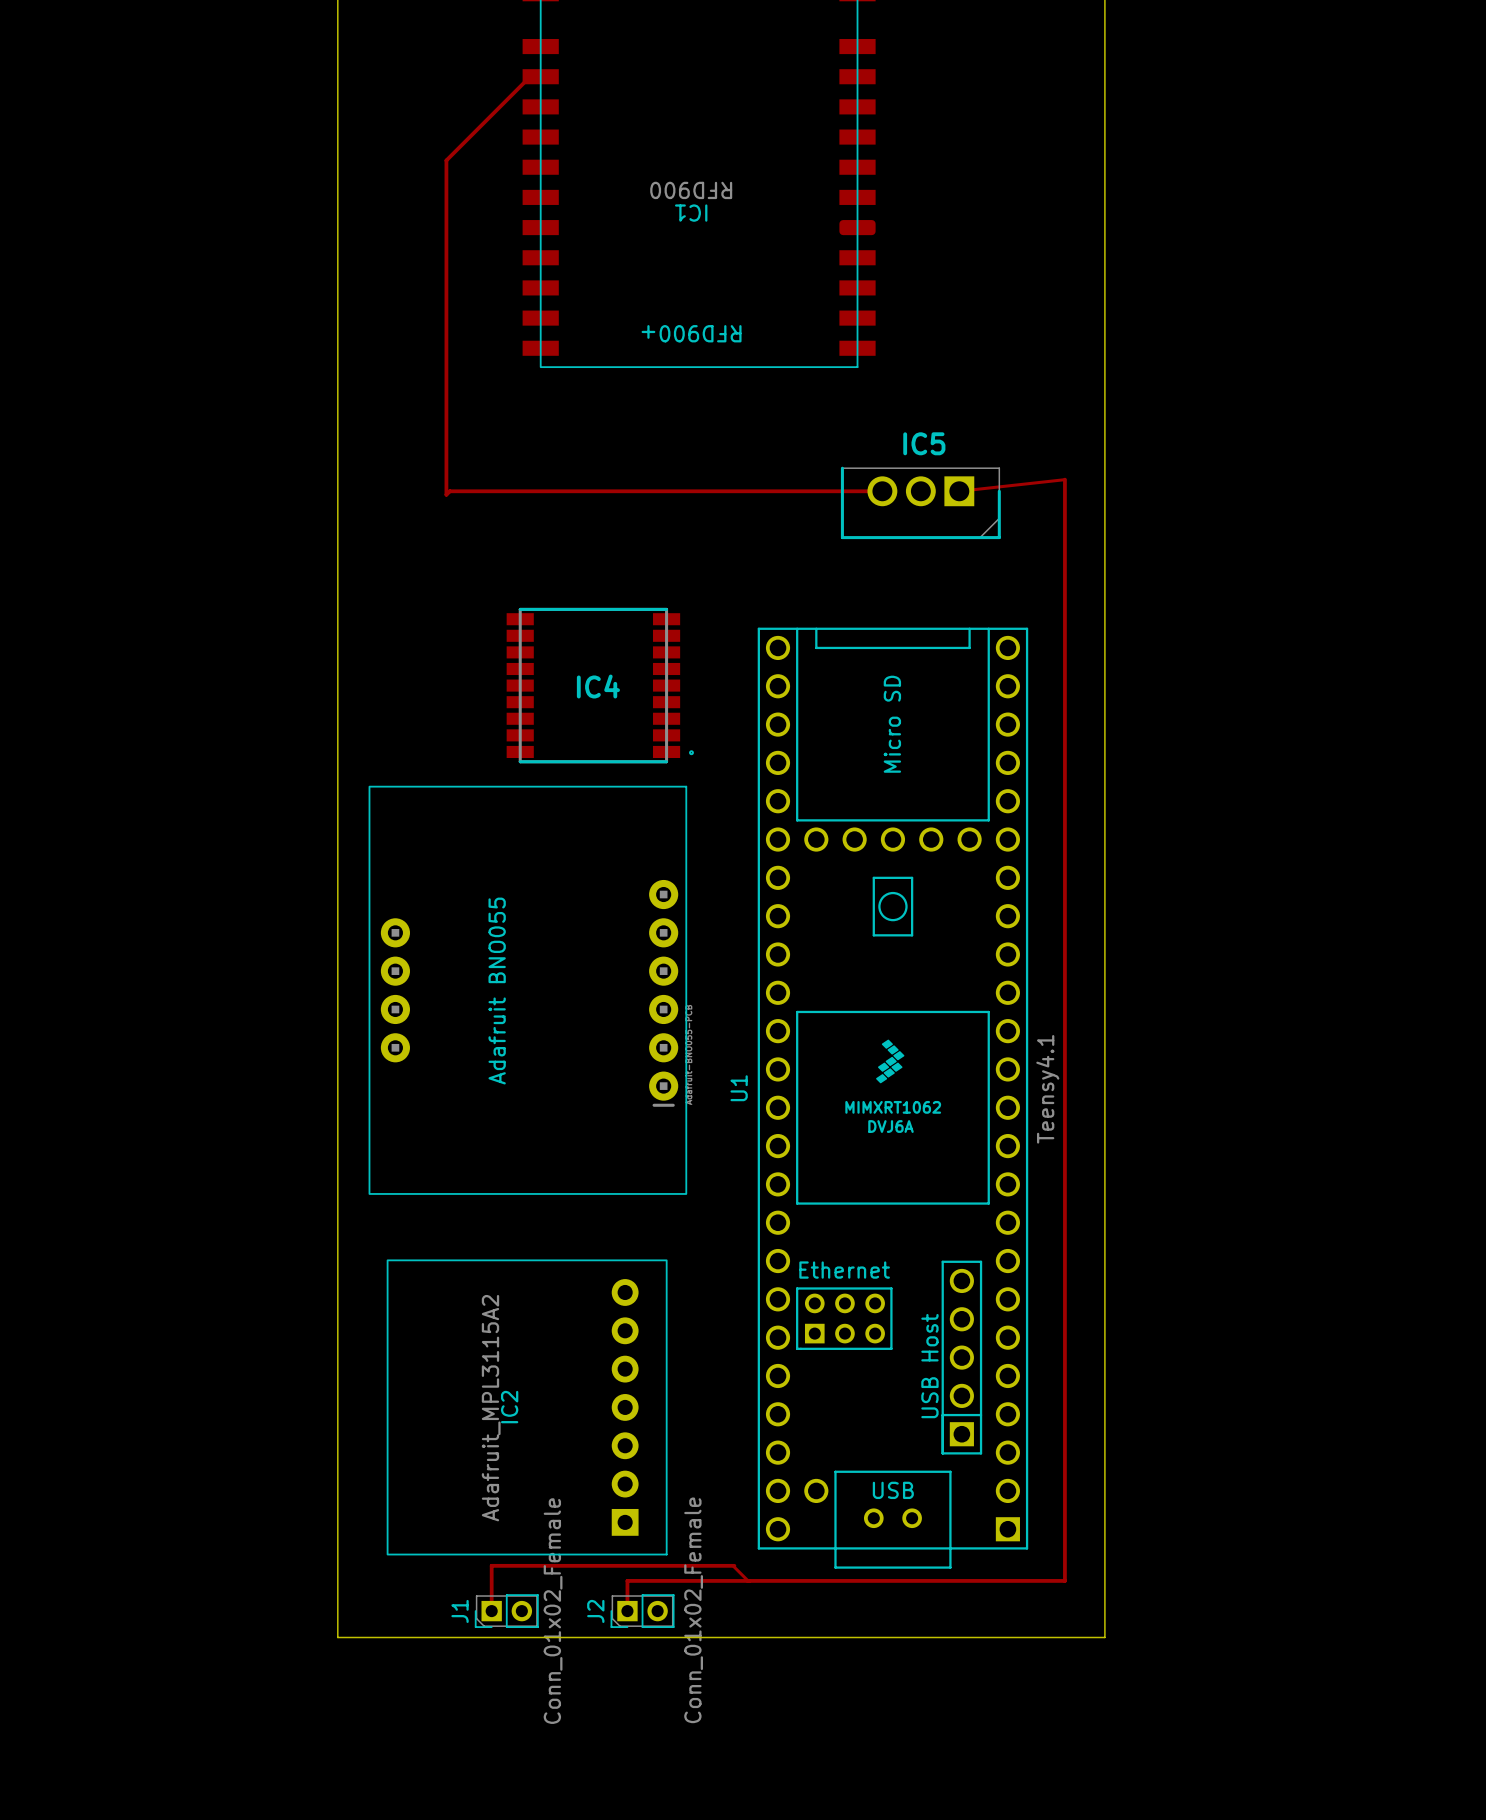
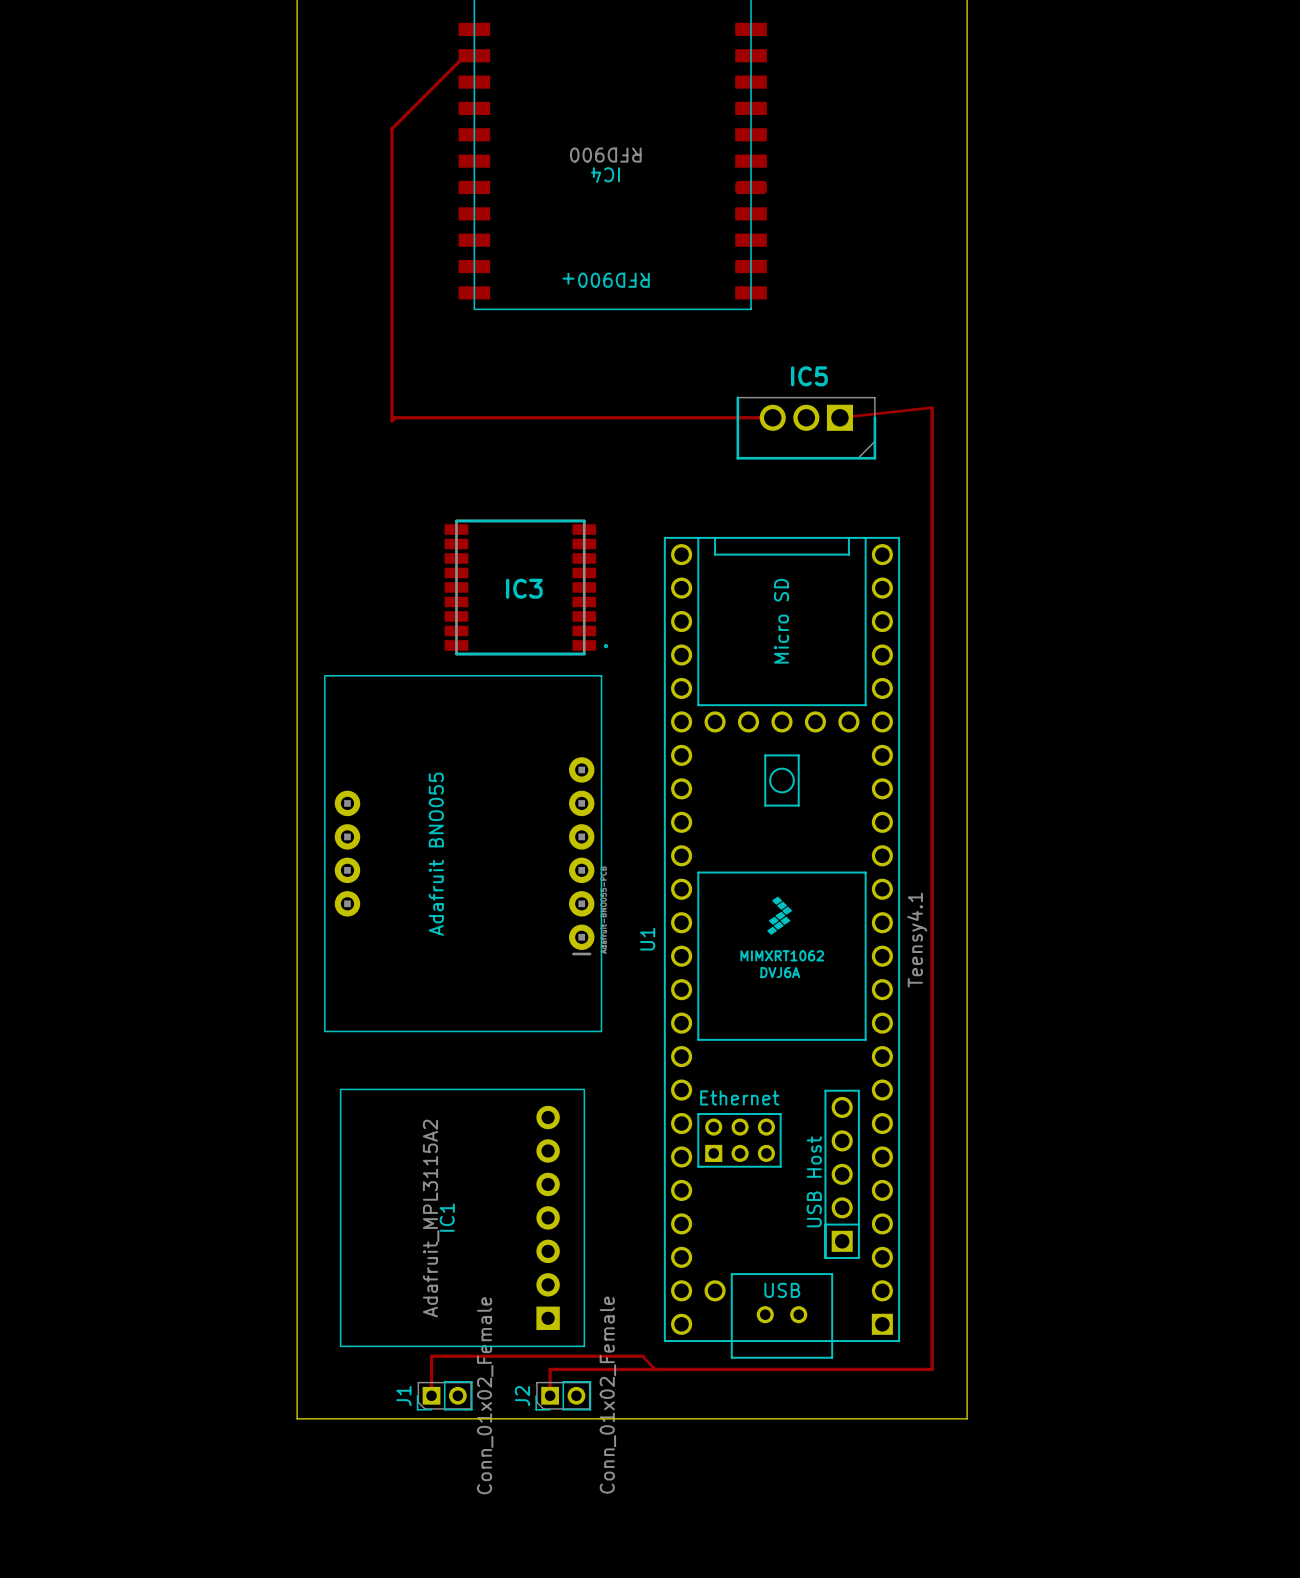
IC1 name: IC1 (691, 213) -> IC4 (605, 175)
IC4 name: IC4 (598, 686) -> IC3 (524, 588)
IC2 name: IC2 (509, 1407) -> IC1 (447, 1217)

